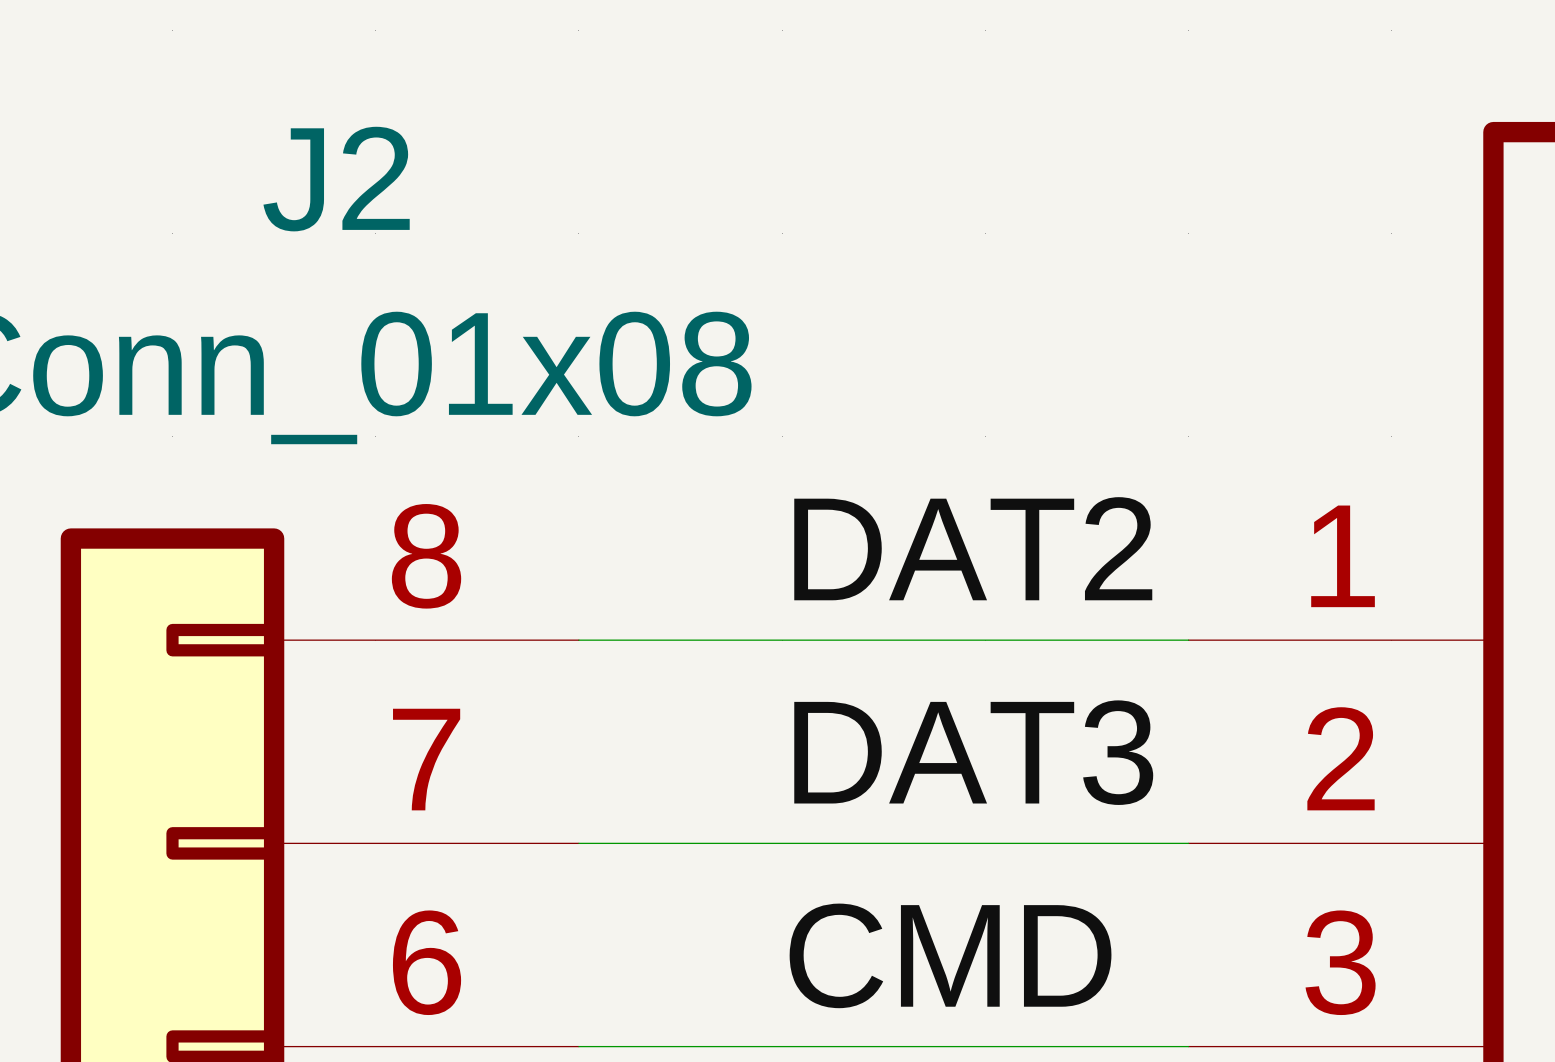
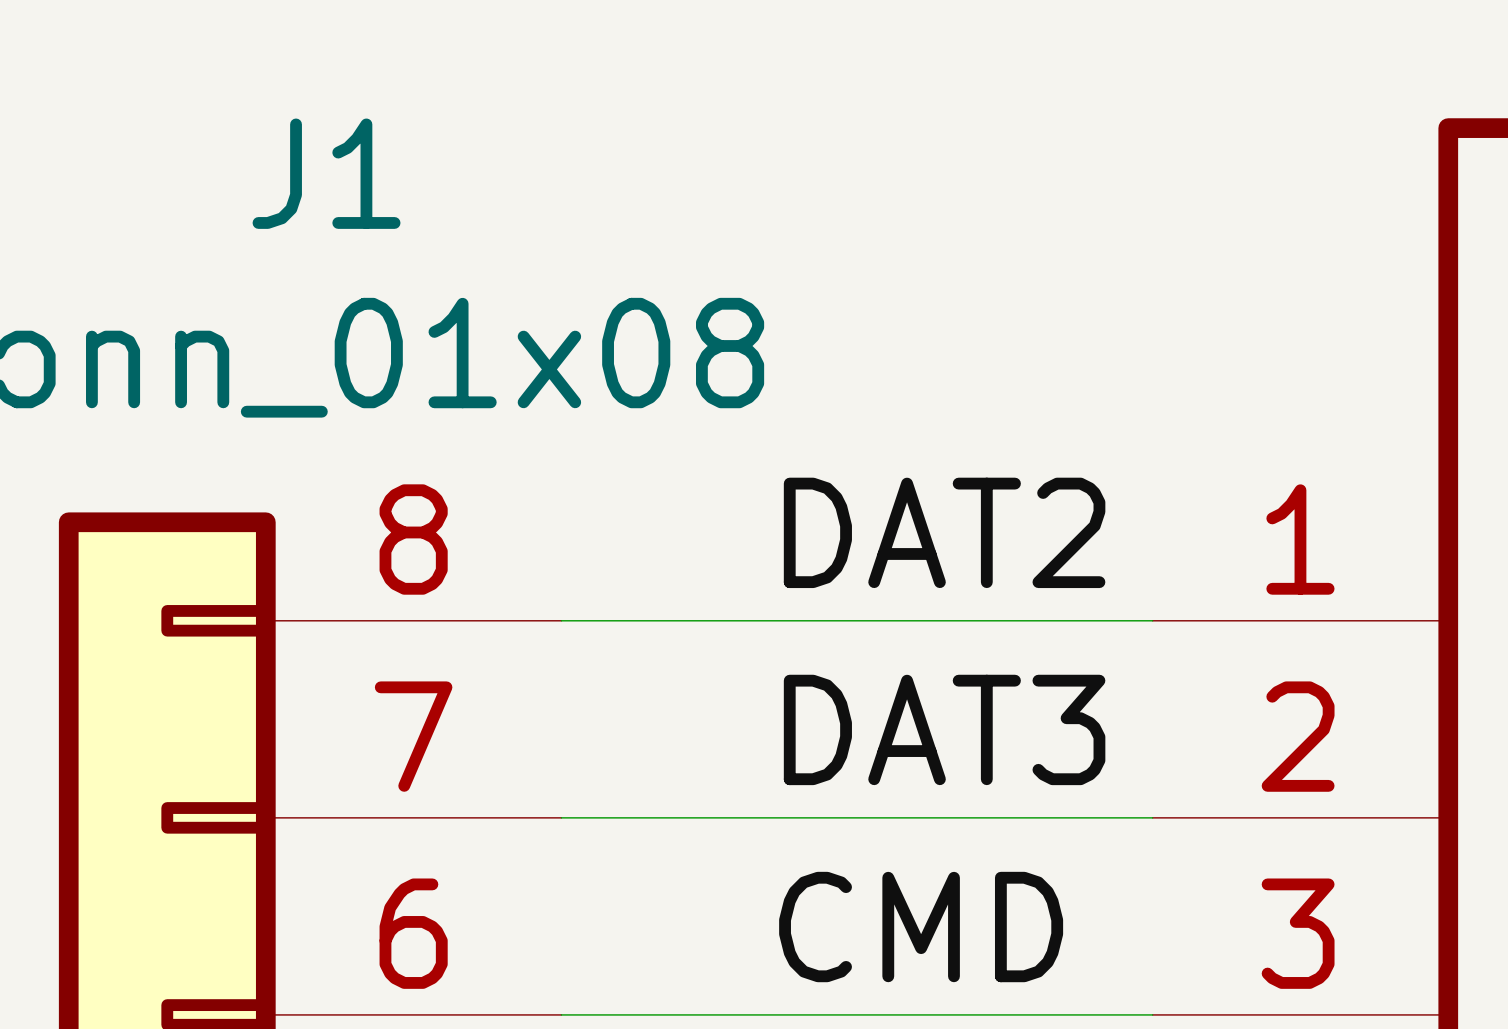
J2 name: J2 (336, 179) -> J1 (326, 173)

